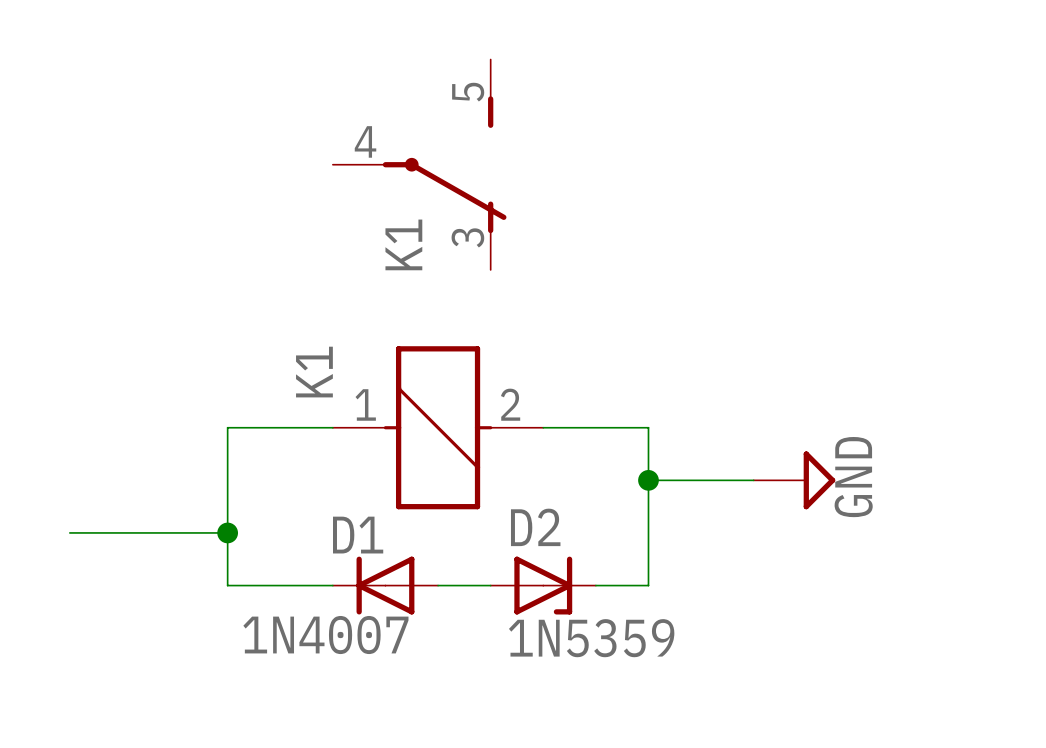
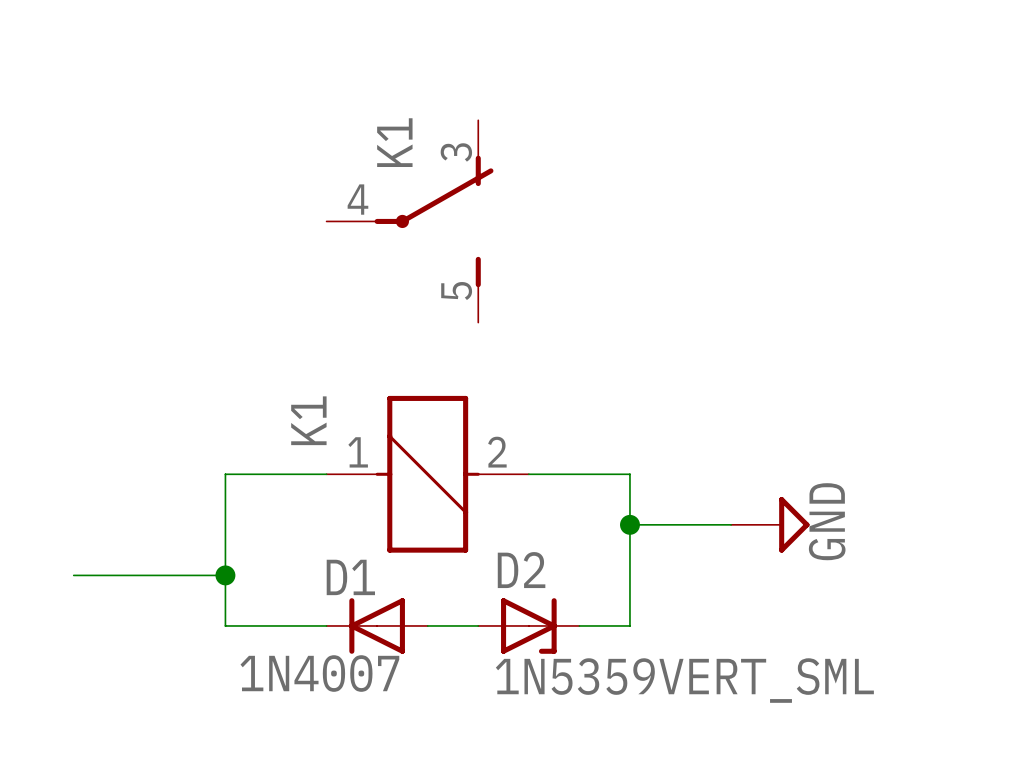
K1 flip: as is (444, 164) -> up-down (434, 221)
D2 value: 1N5359 (591, 638) -> 1N5359VERT_SML (684, 680)

